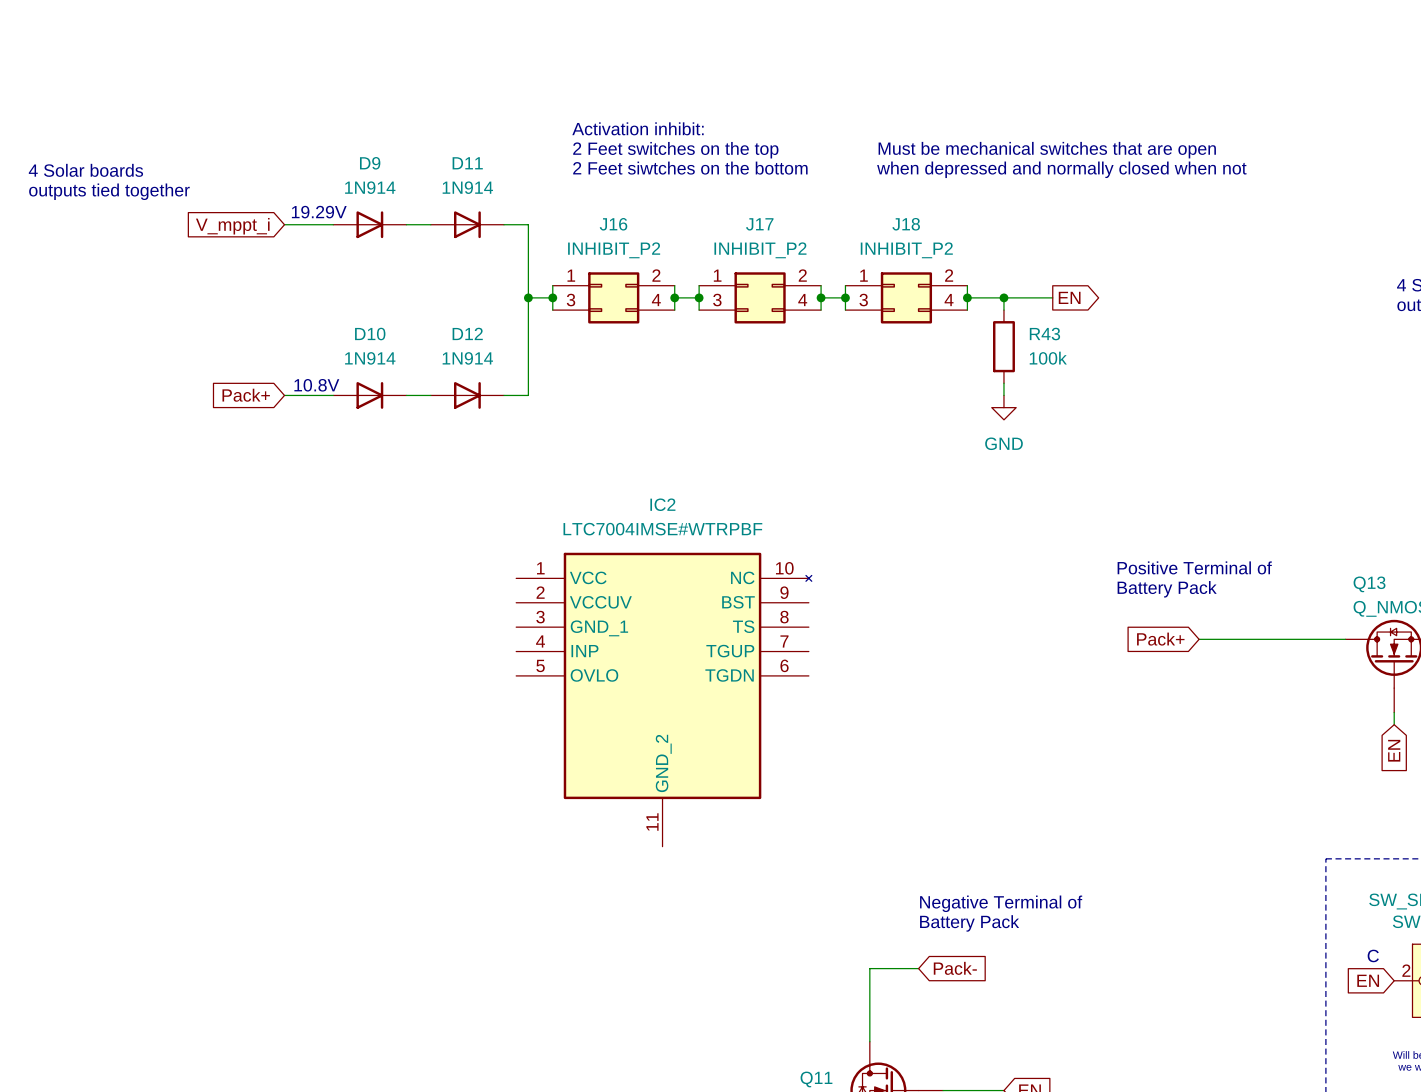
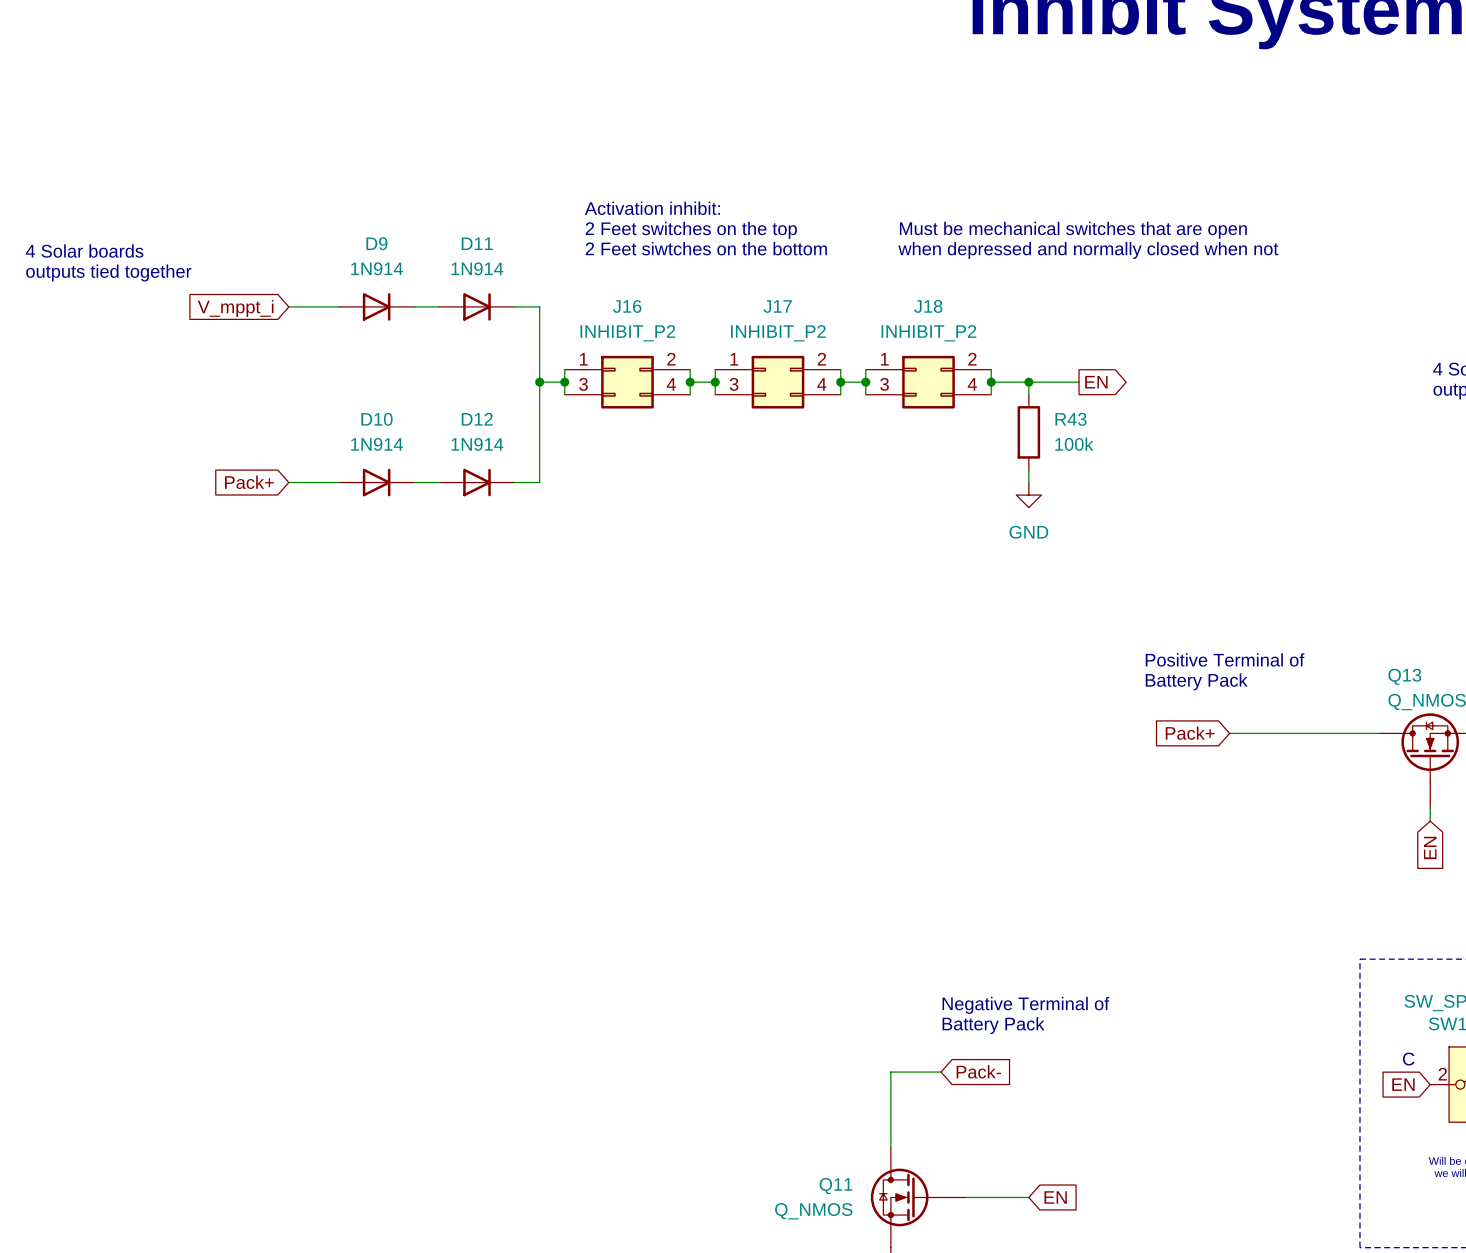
text: 19.29V (319, 212) -> none
text: 10.8V (316, 385) -> none
IC2: LTC7004IMSE#WTRPBF (663, 699) -> none

